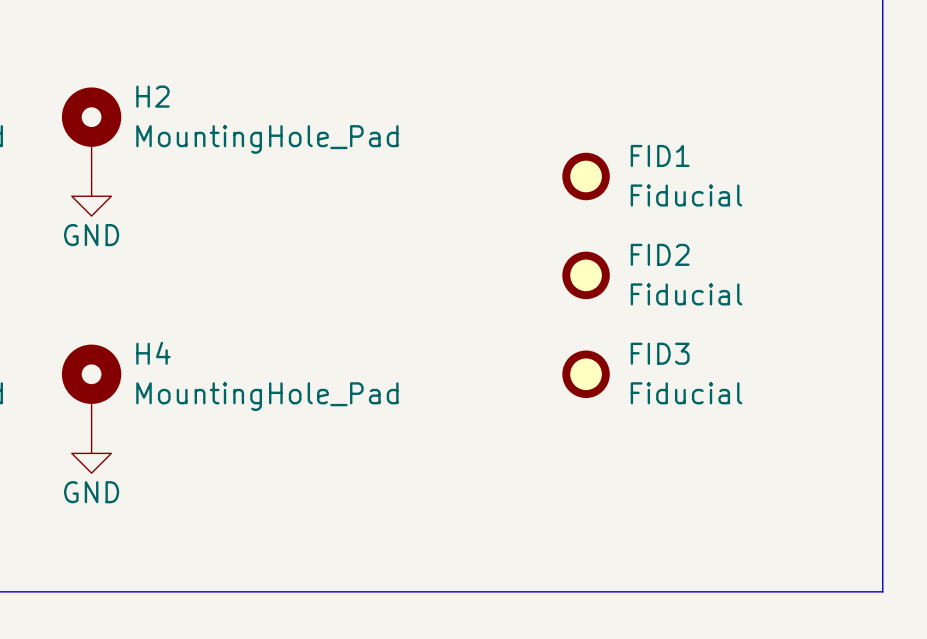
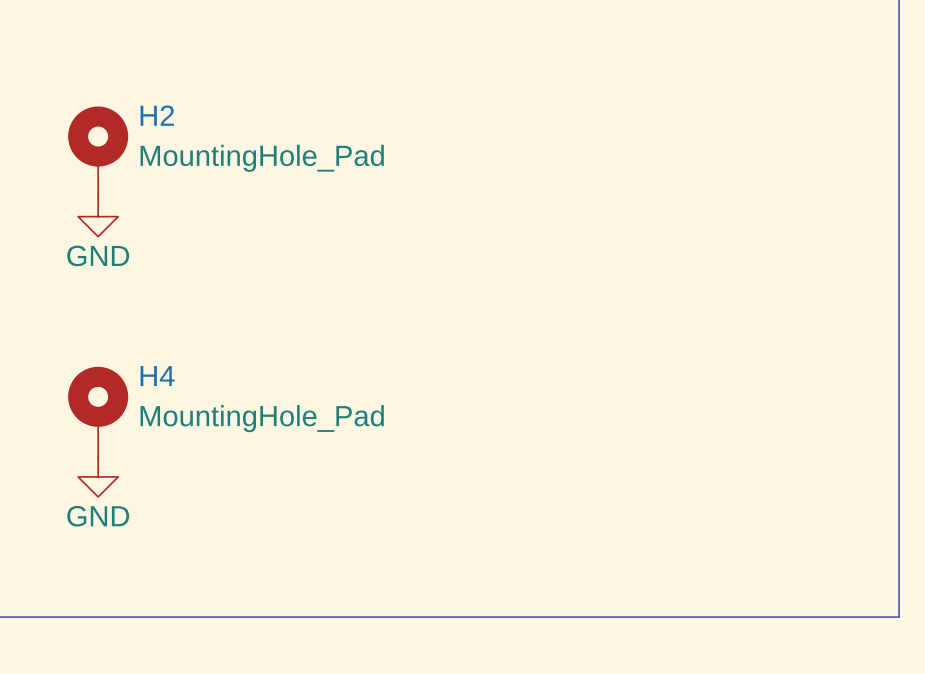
FID1: Fiducial (586, 176) -> none
FID2: Fiducial (586, 275) -> none
FID3: Fiducial (586, 374) -> none

